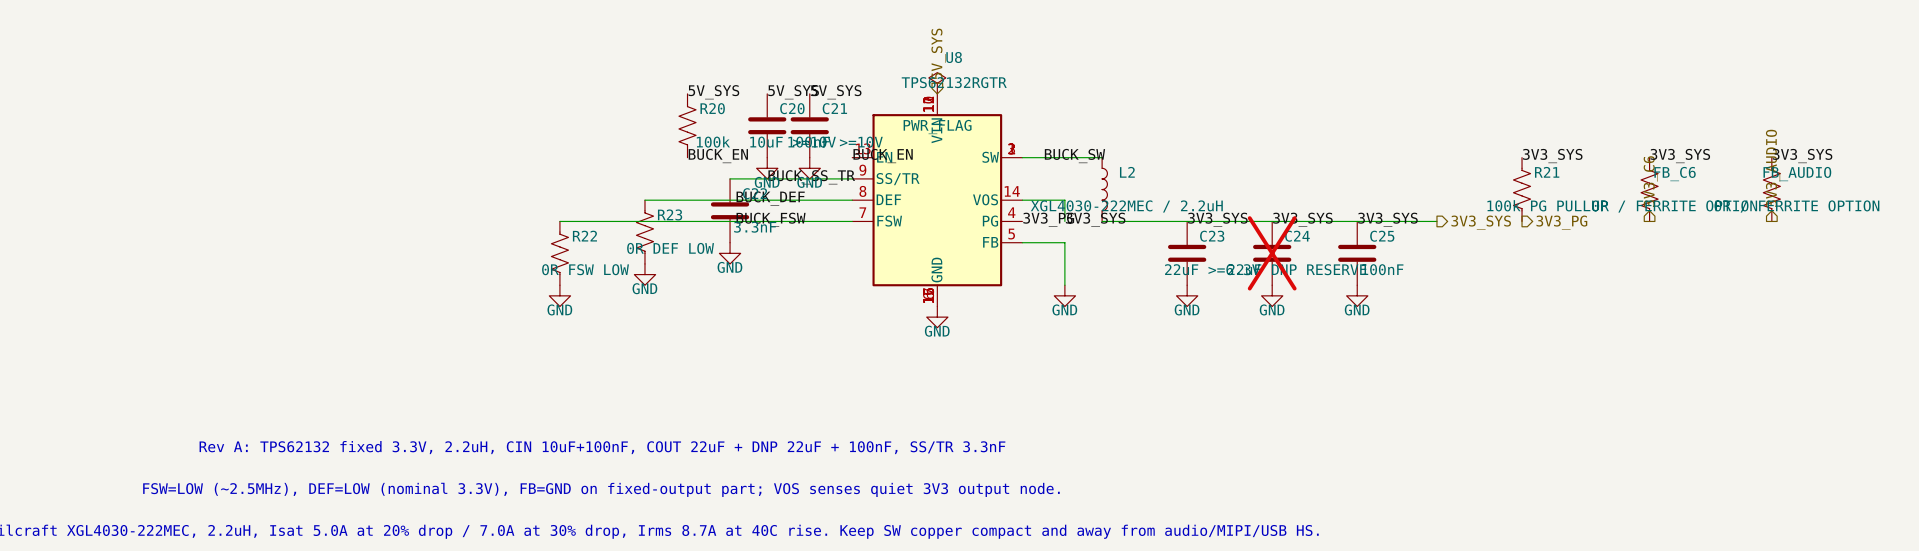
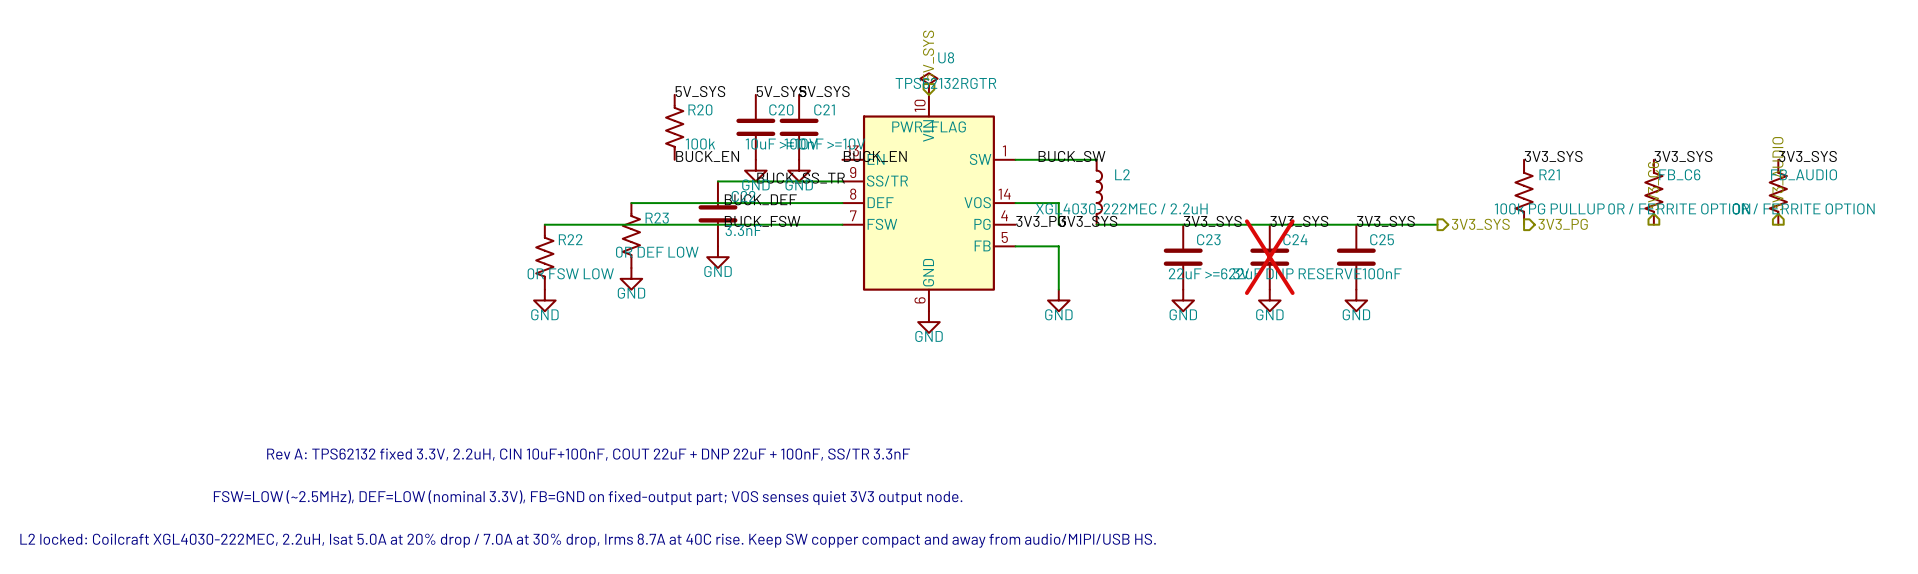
U8 symbol: [852, 93, 1023, 307] -> [842, 94, 1016, 312]

